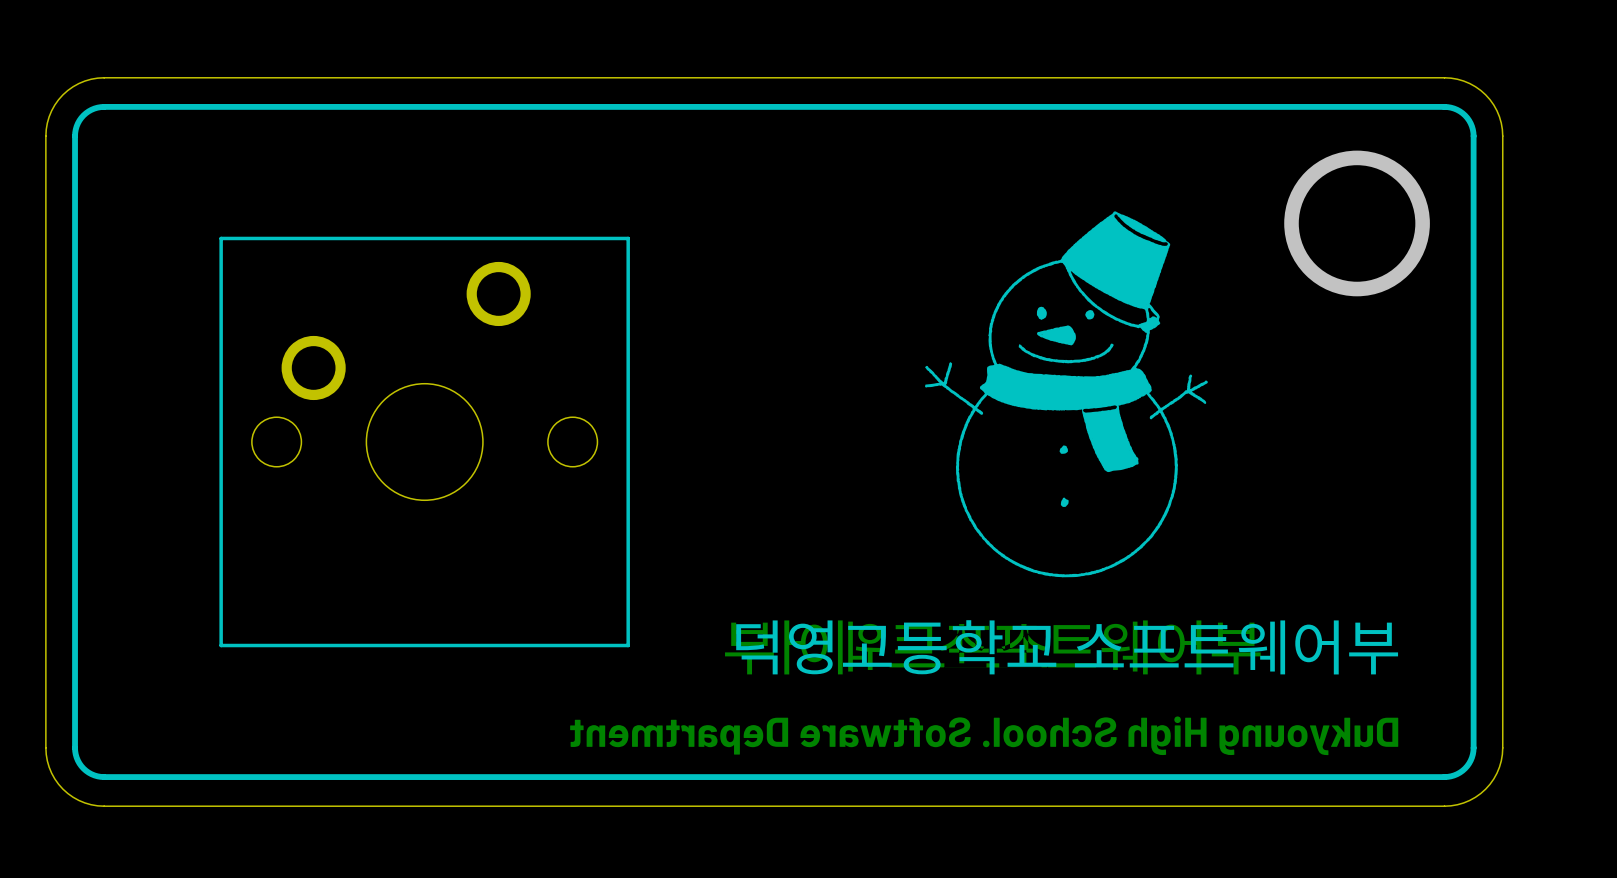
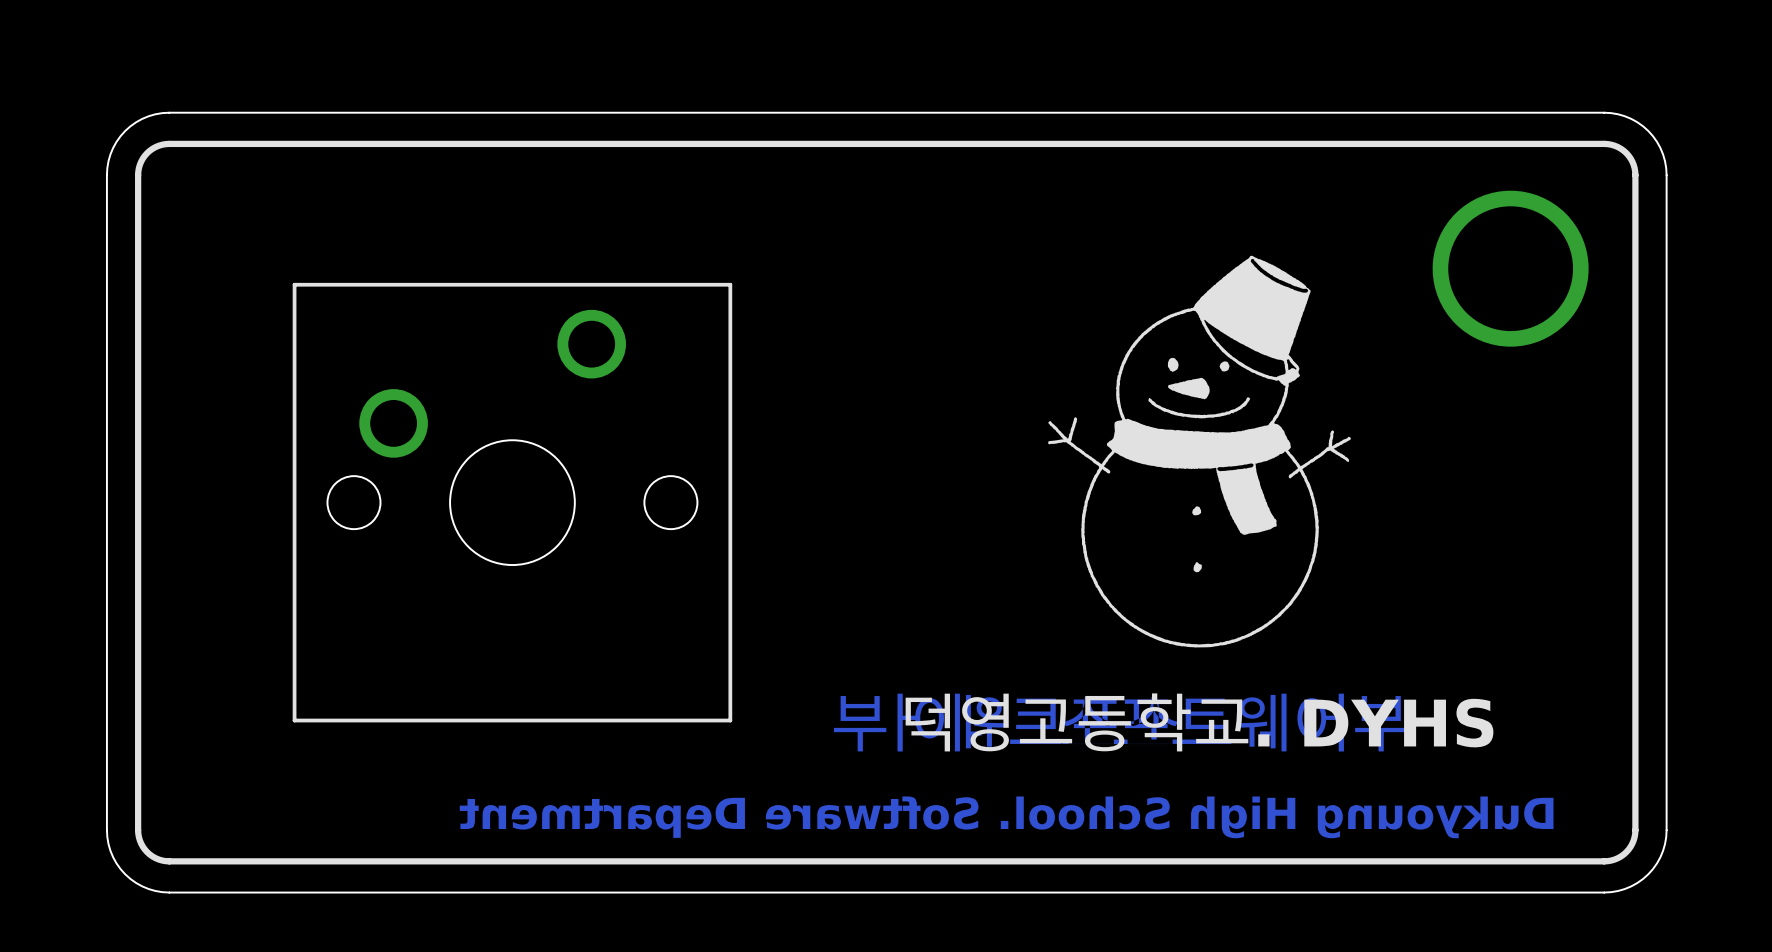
text: 덕영고등학교 소프트웨어부 (1067, 647) -> 덕영고등학교. DYHS (1199, 722)

